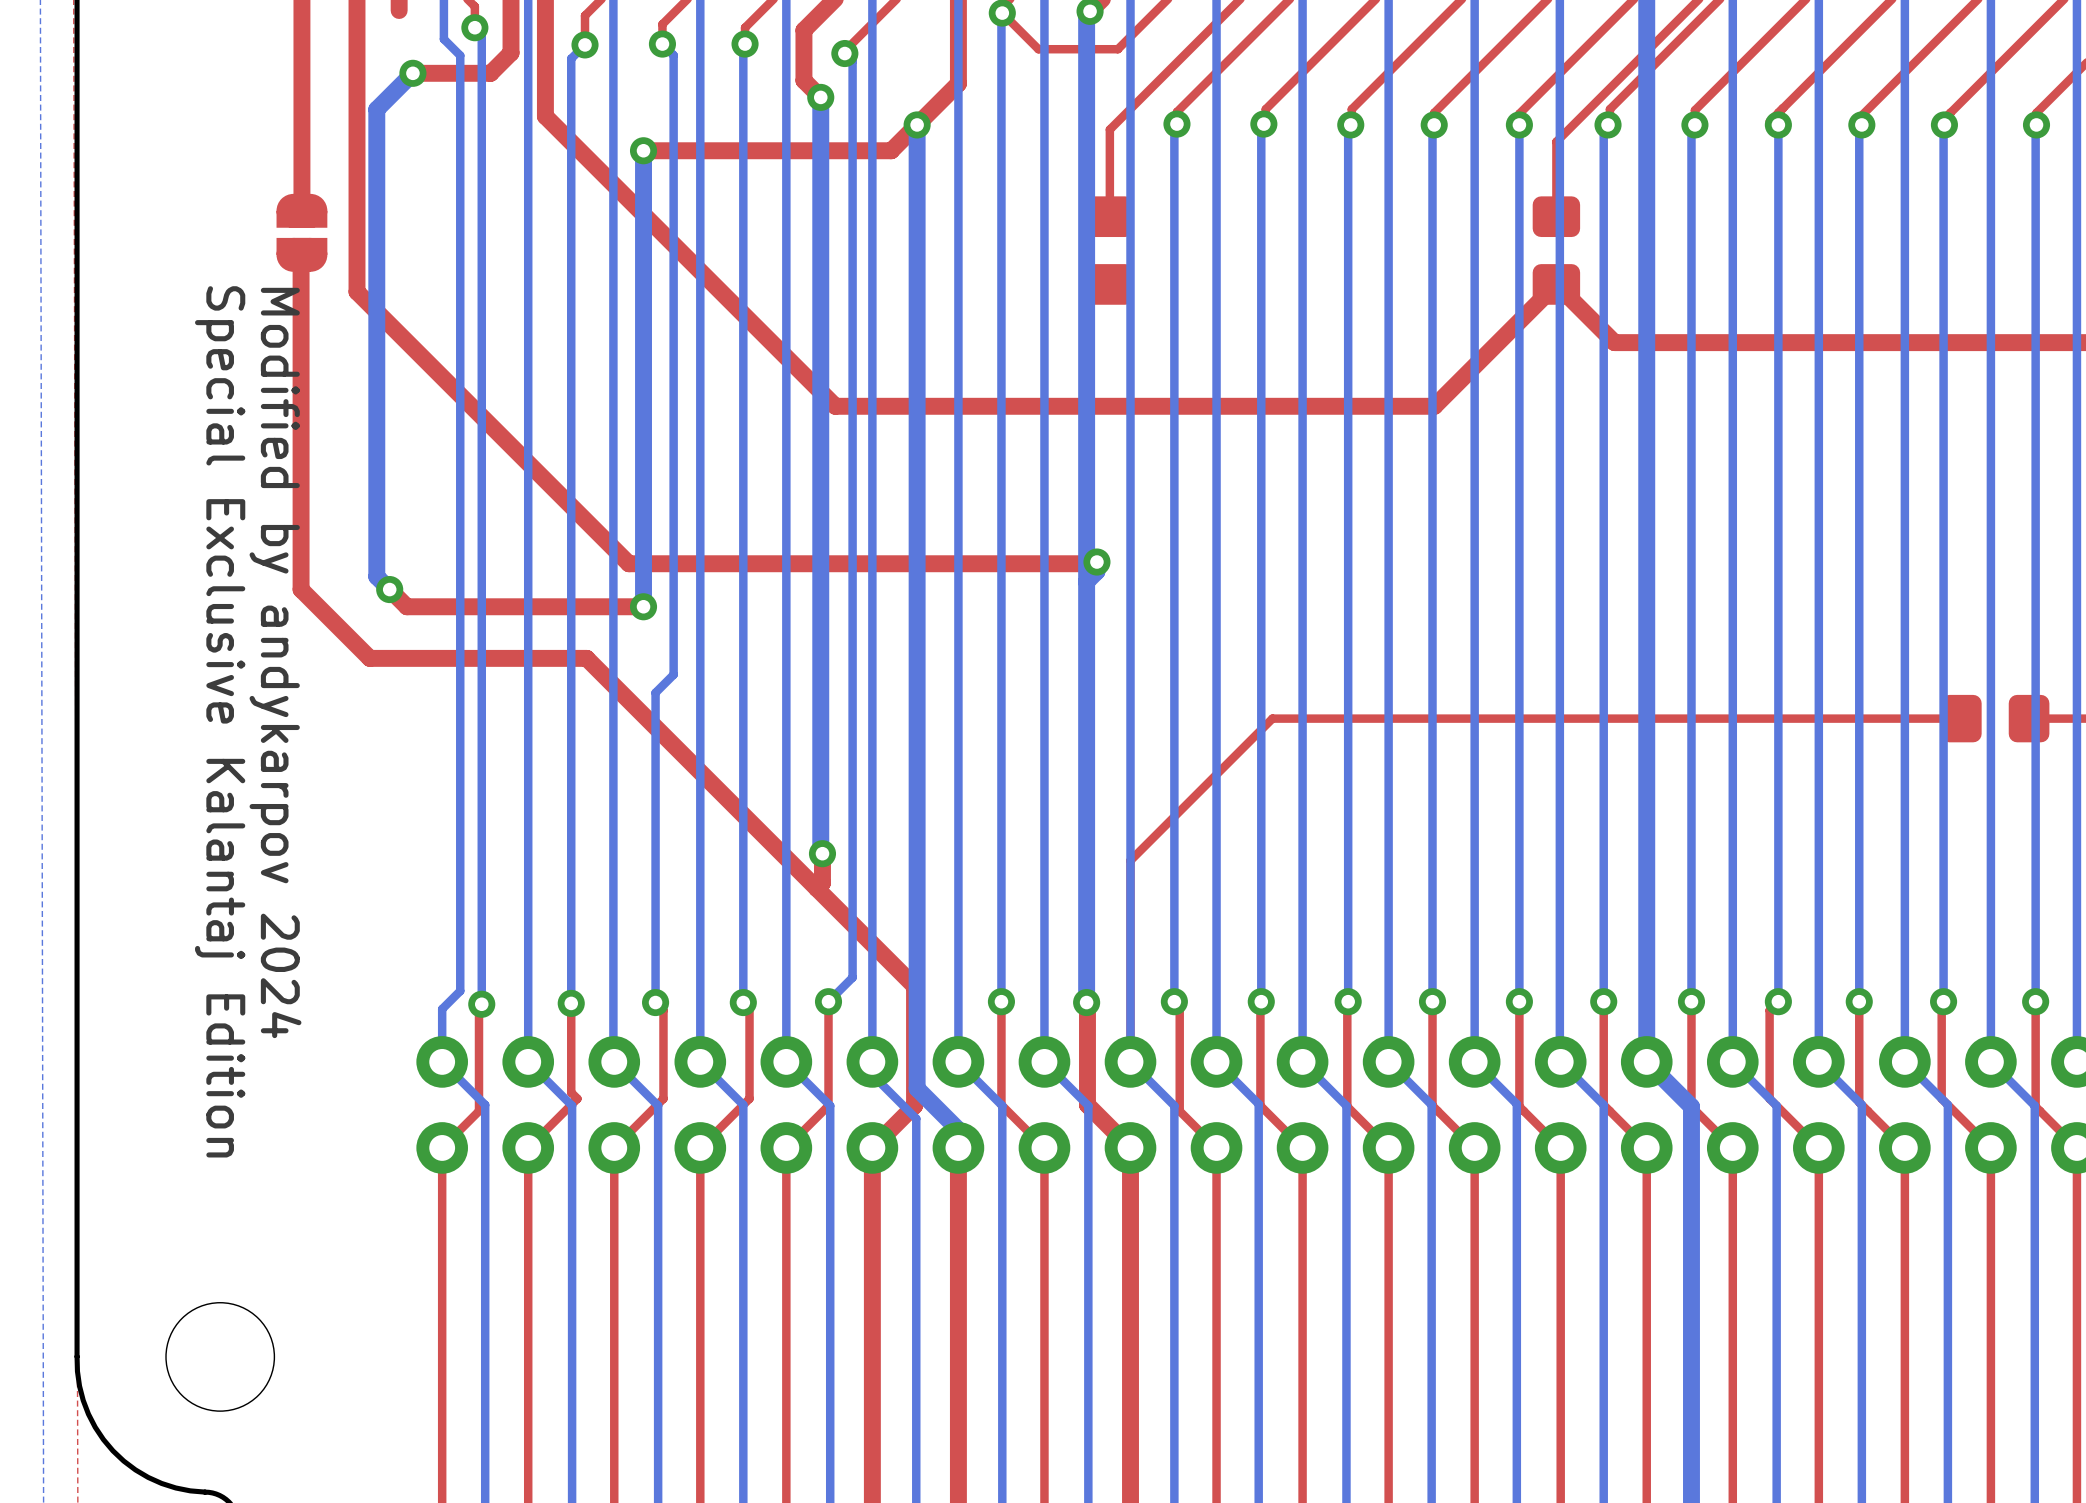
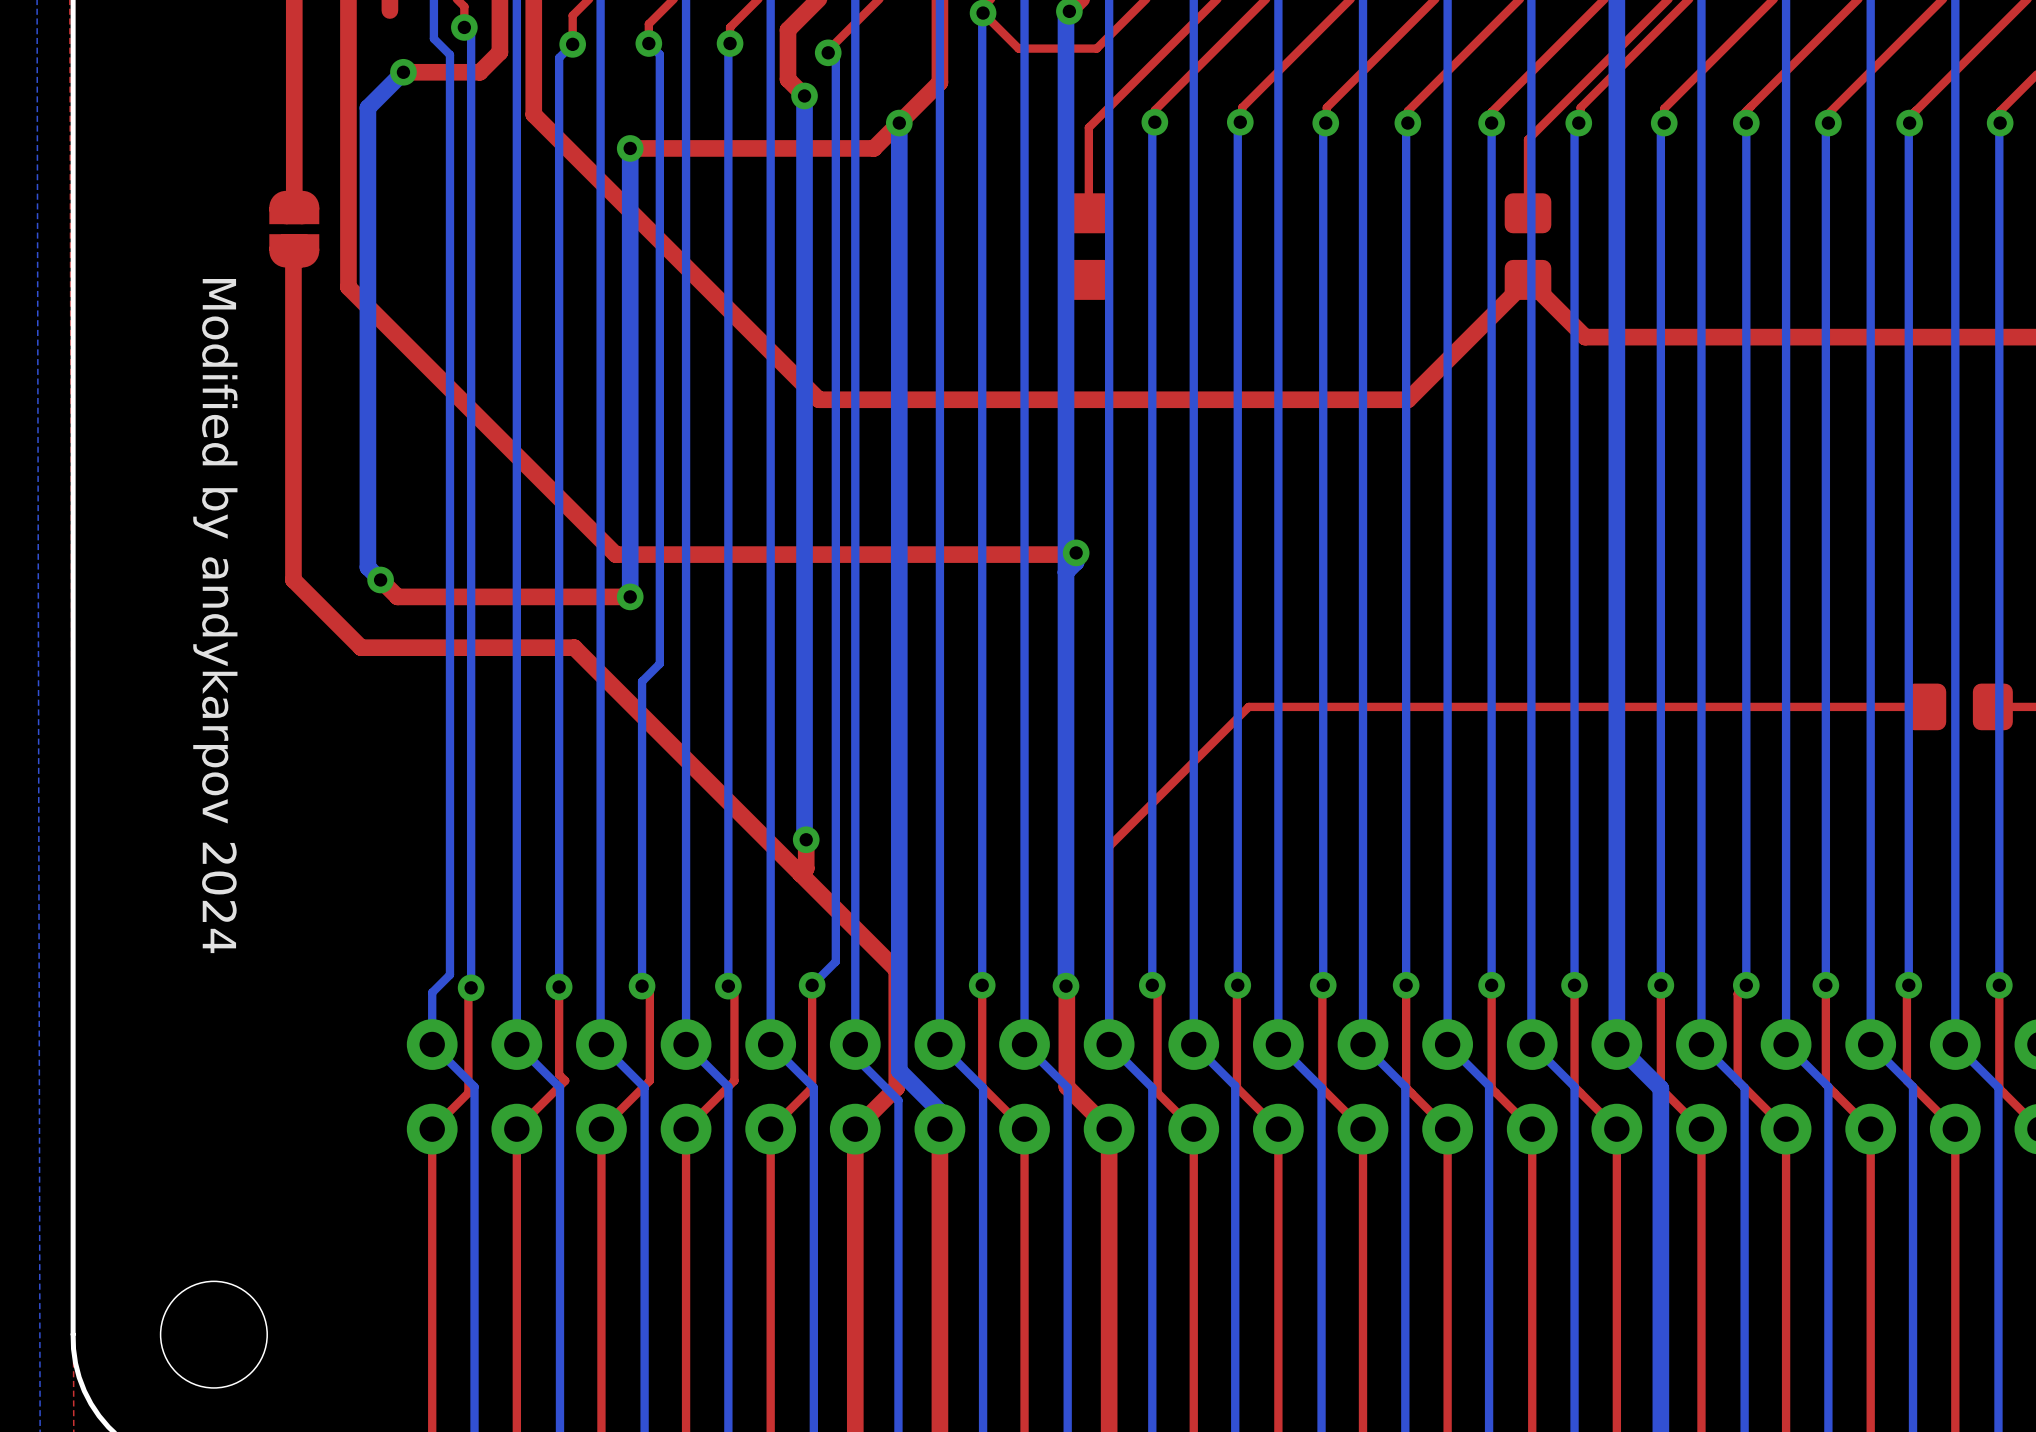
text: Modified by andykarpov 2024 (275, 662) -> none
text: Special Exclusive Kalantaj Edition (220, 721) -> Modified by andykarpov 2024 (215, 616)

